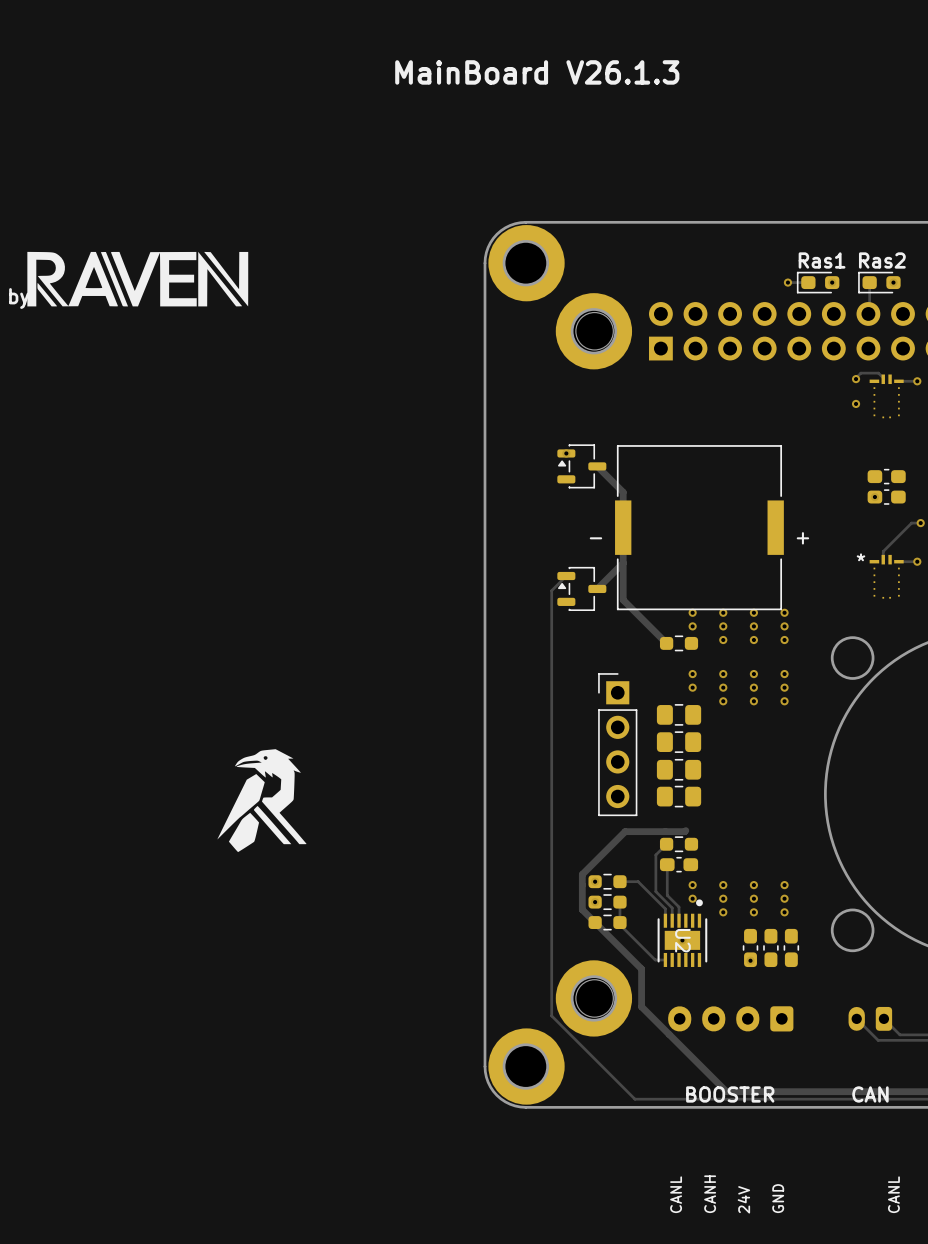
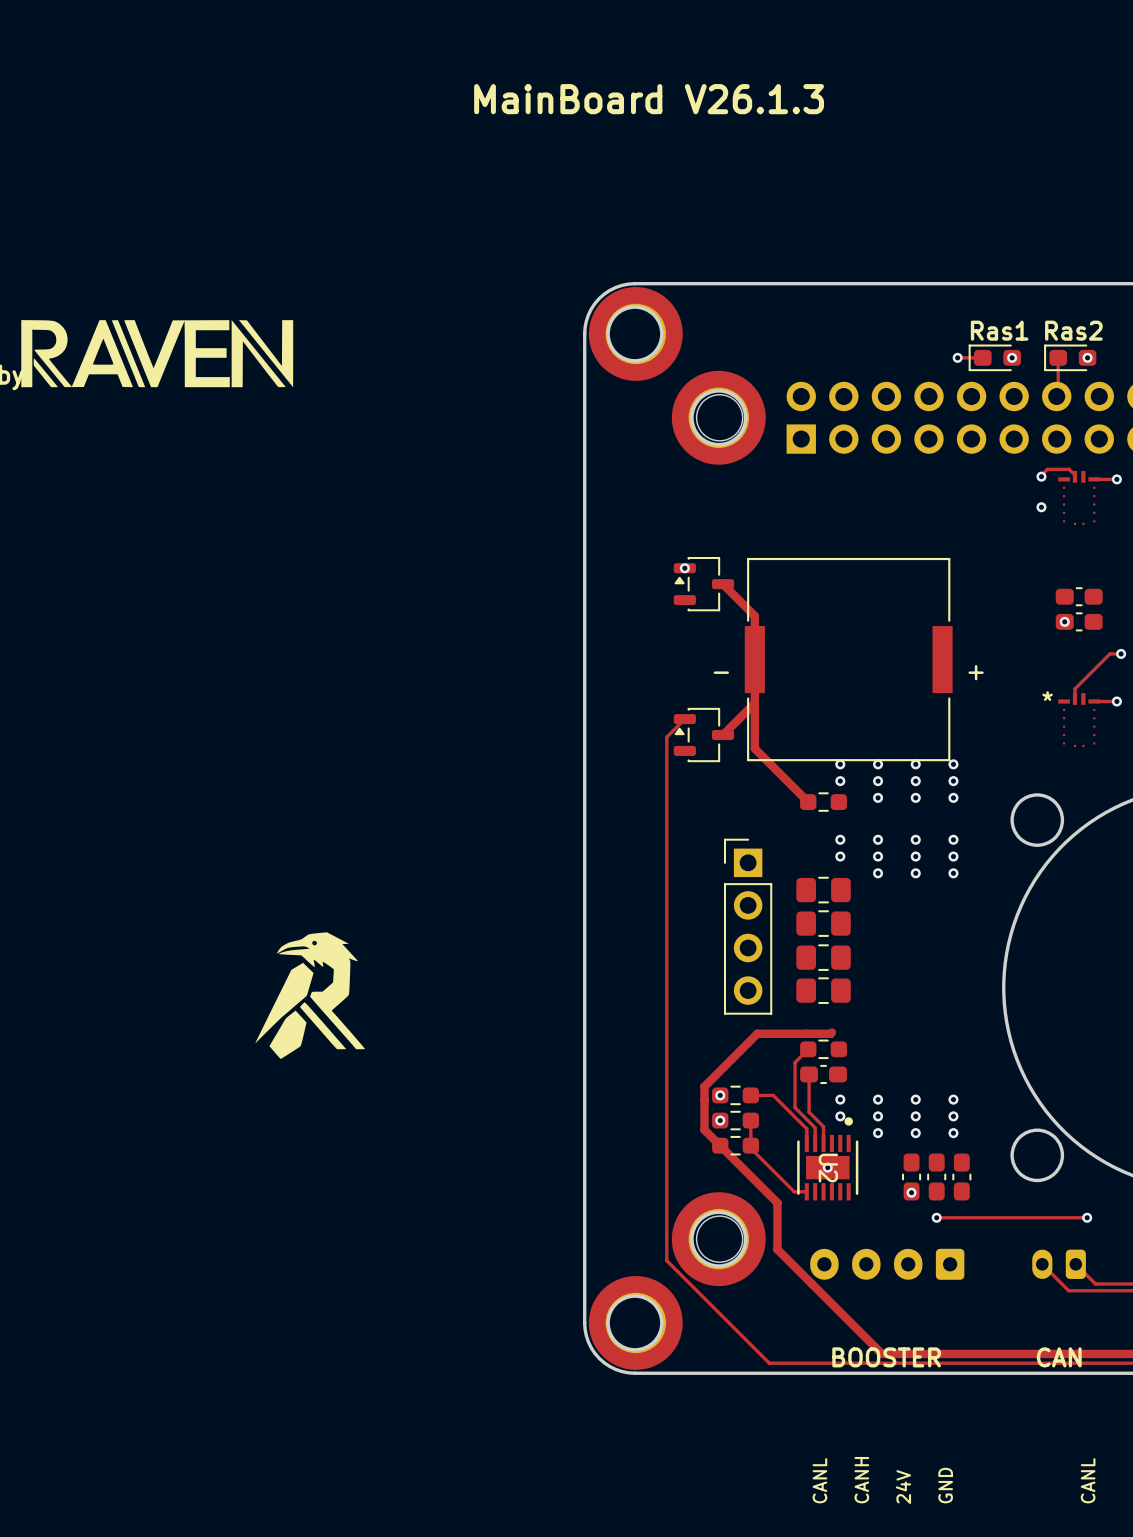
track: none -> (936, 1217) (1087, 1217)
via: none -> (936, 1217)
via: none -> (1087, 1217)

